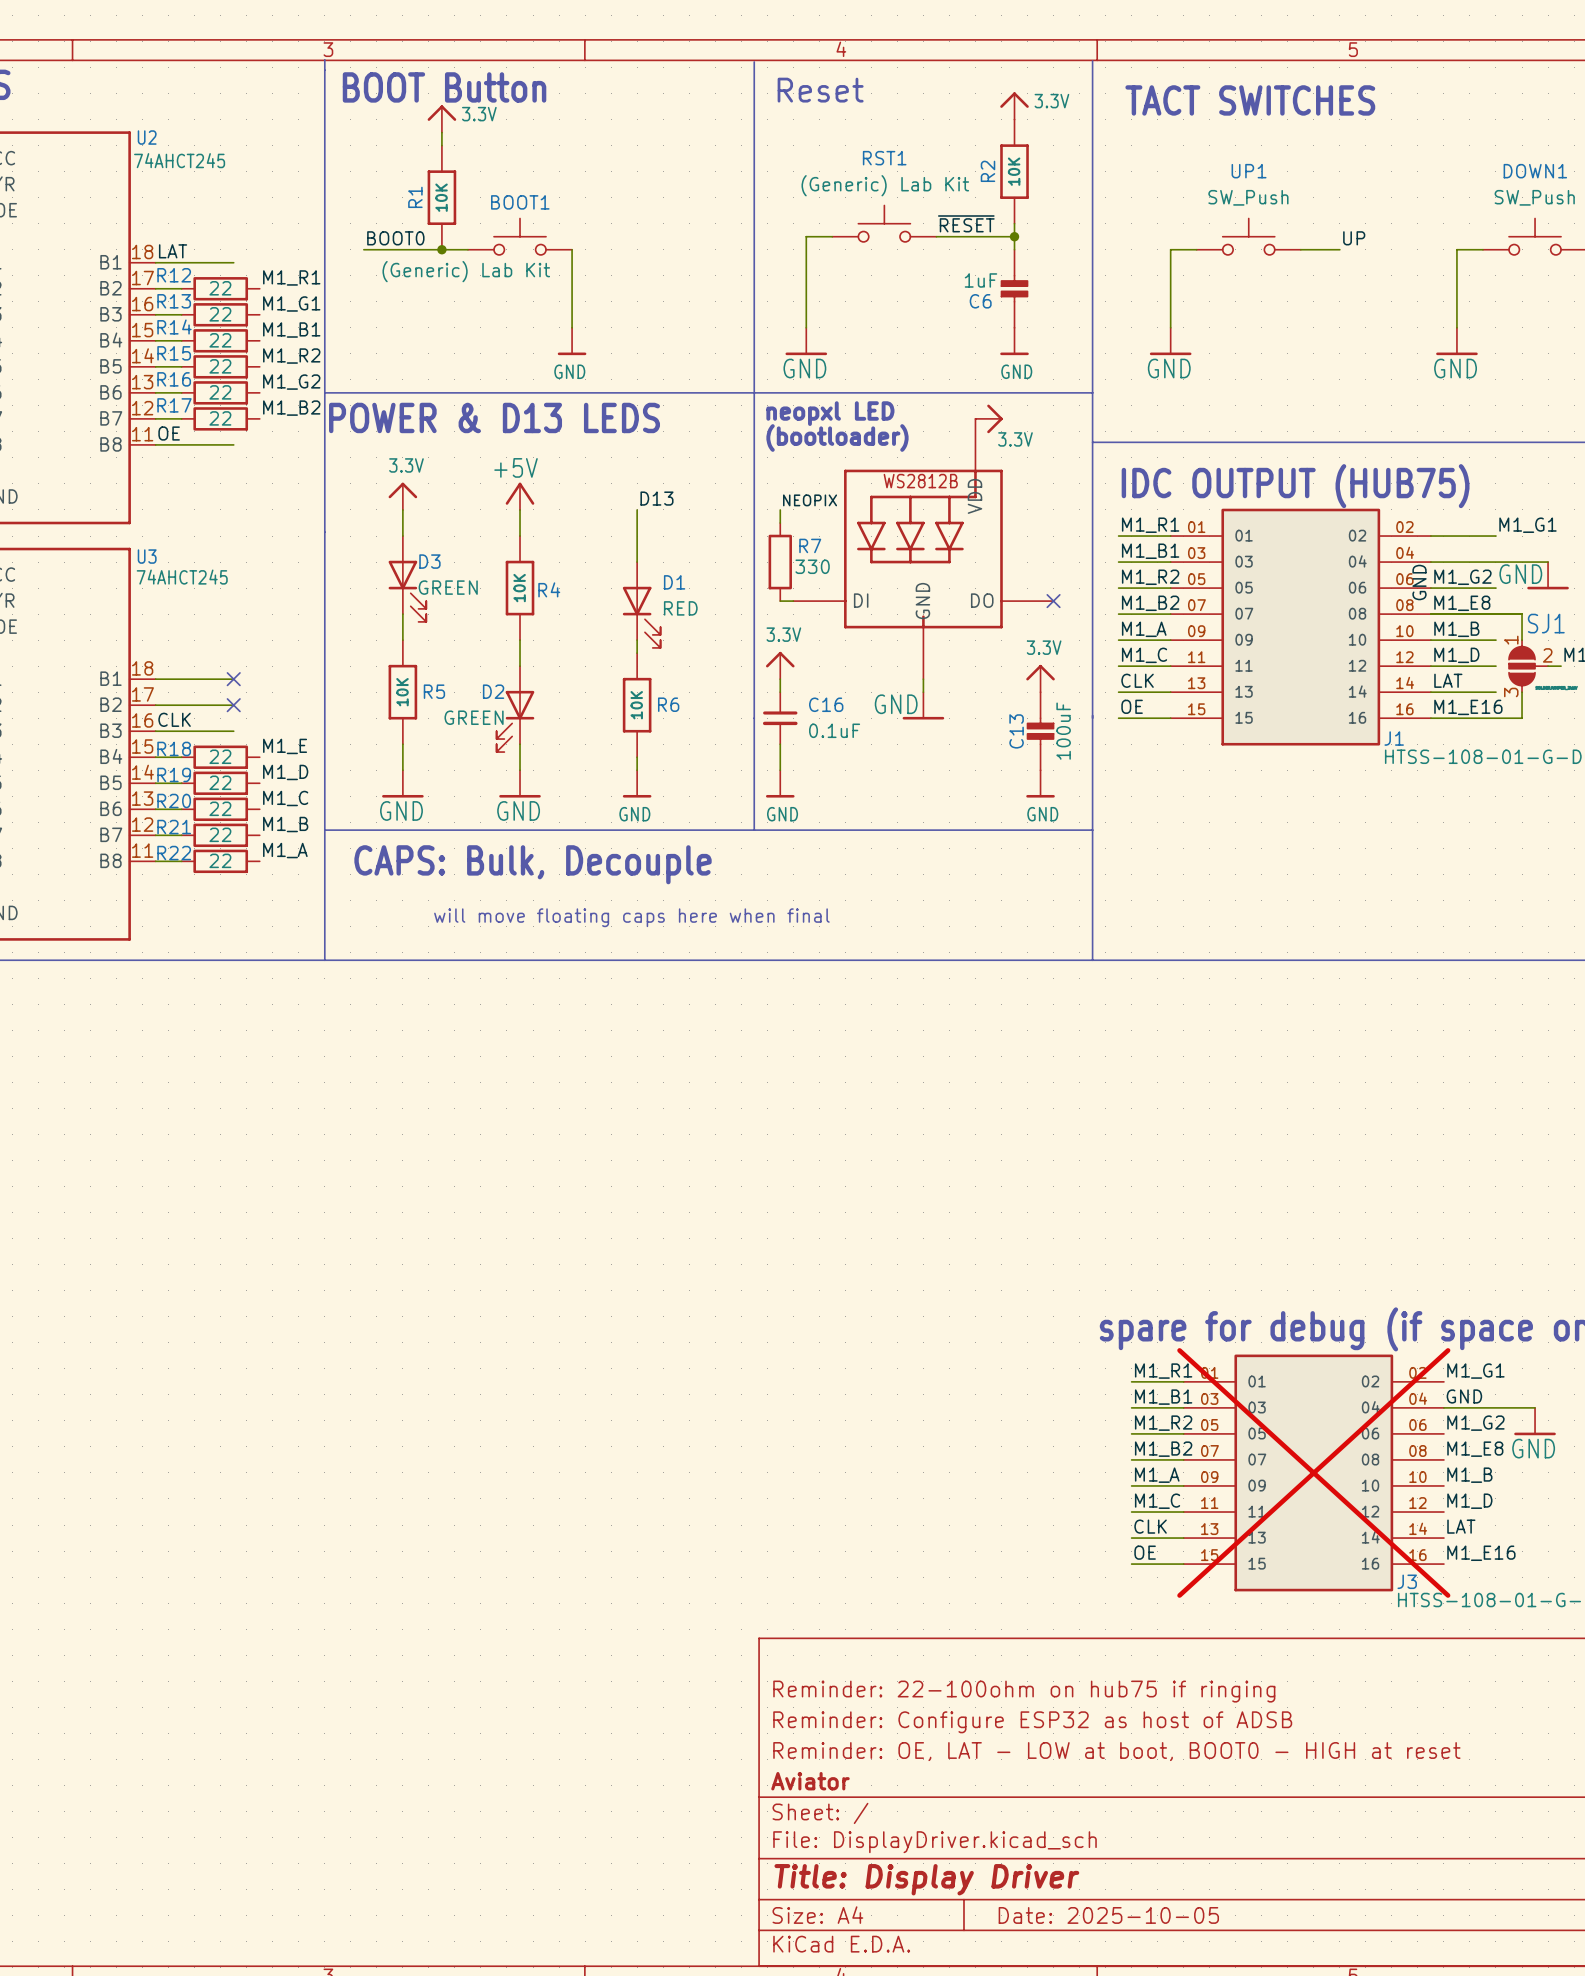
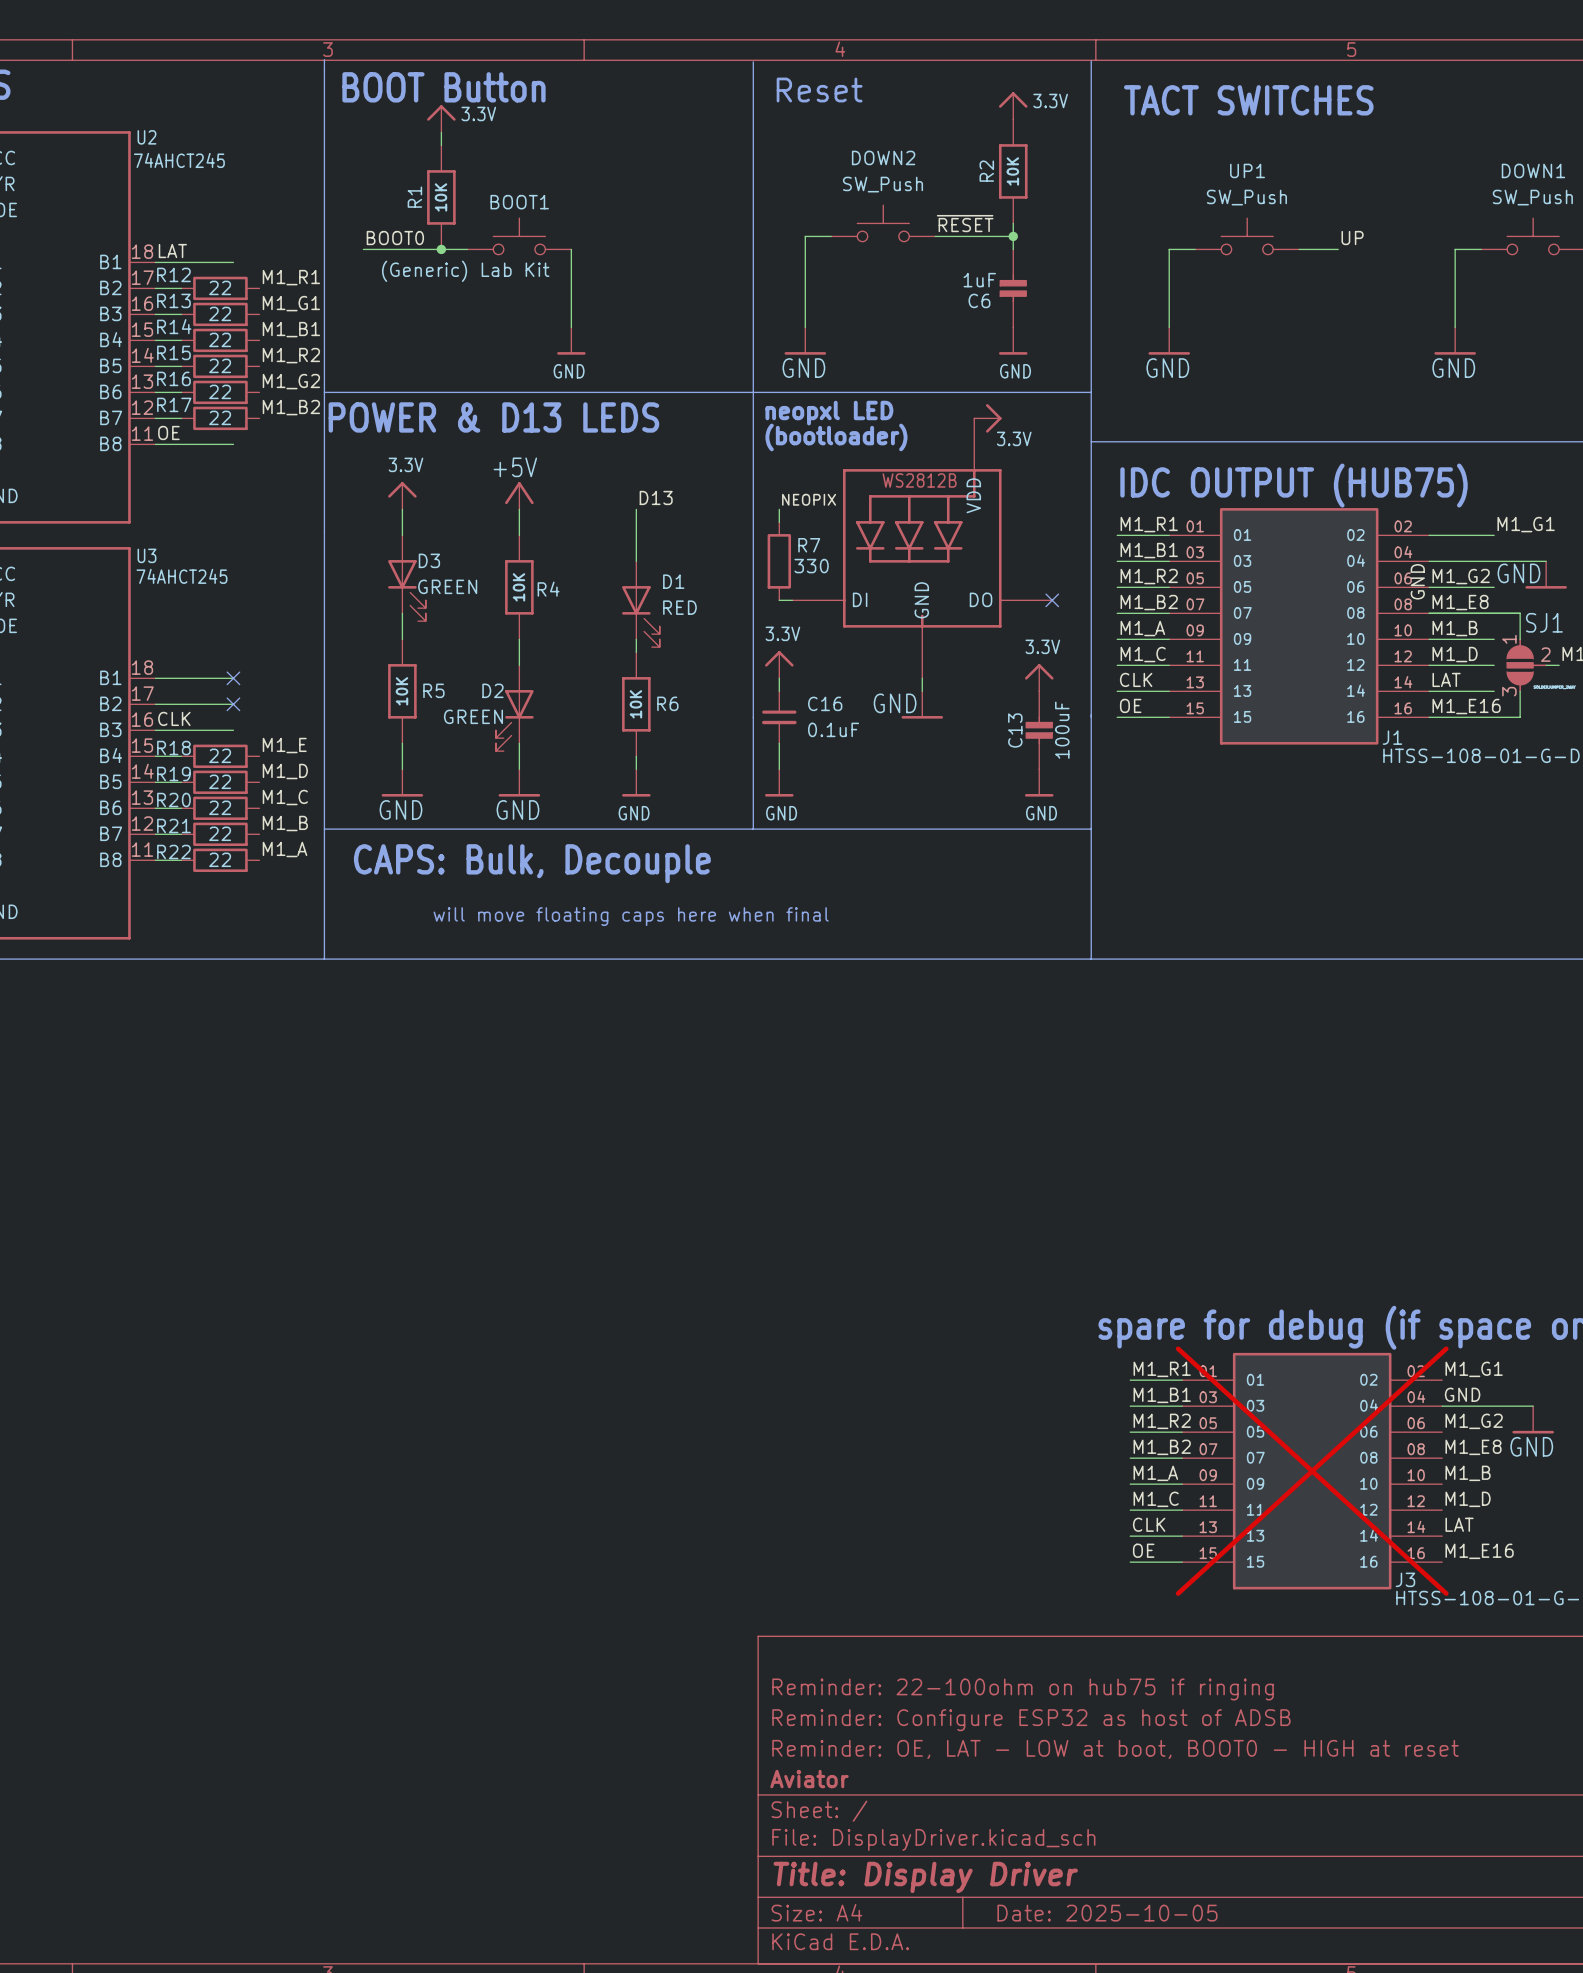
RST1 name: RST1 (884, 158) -> DOWN2 (883, 157)
RST1 value: (Generic) Lab Kit (885, 185) -> SW_Push (882, 184)

